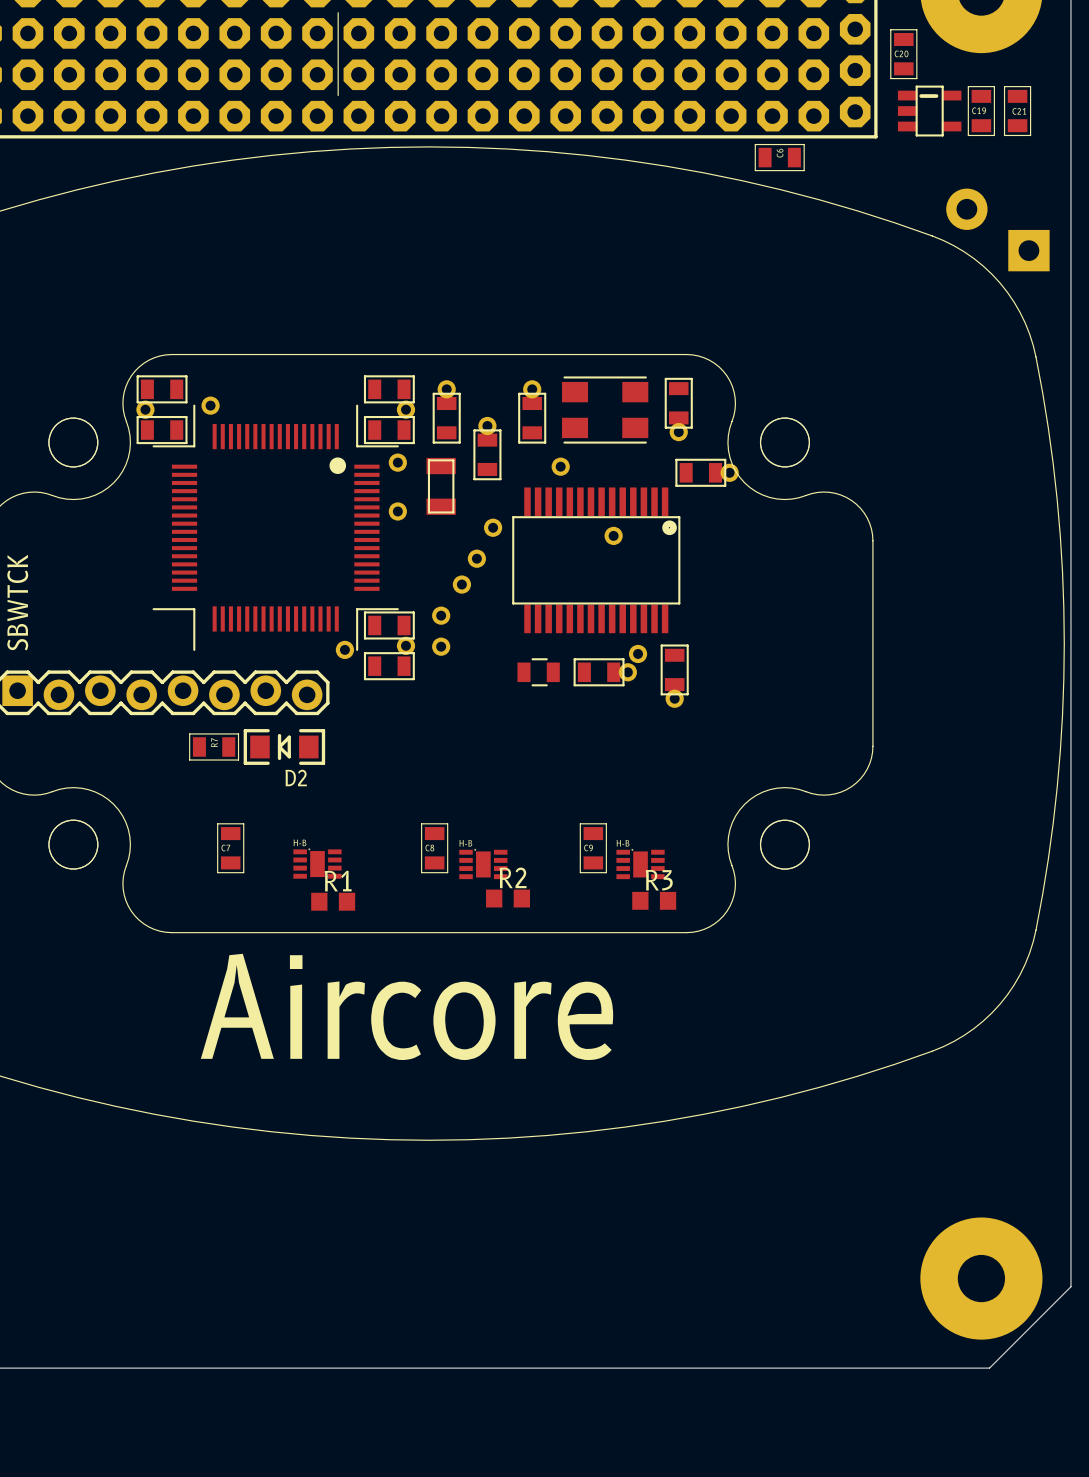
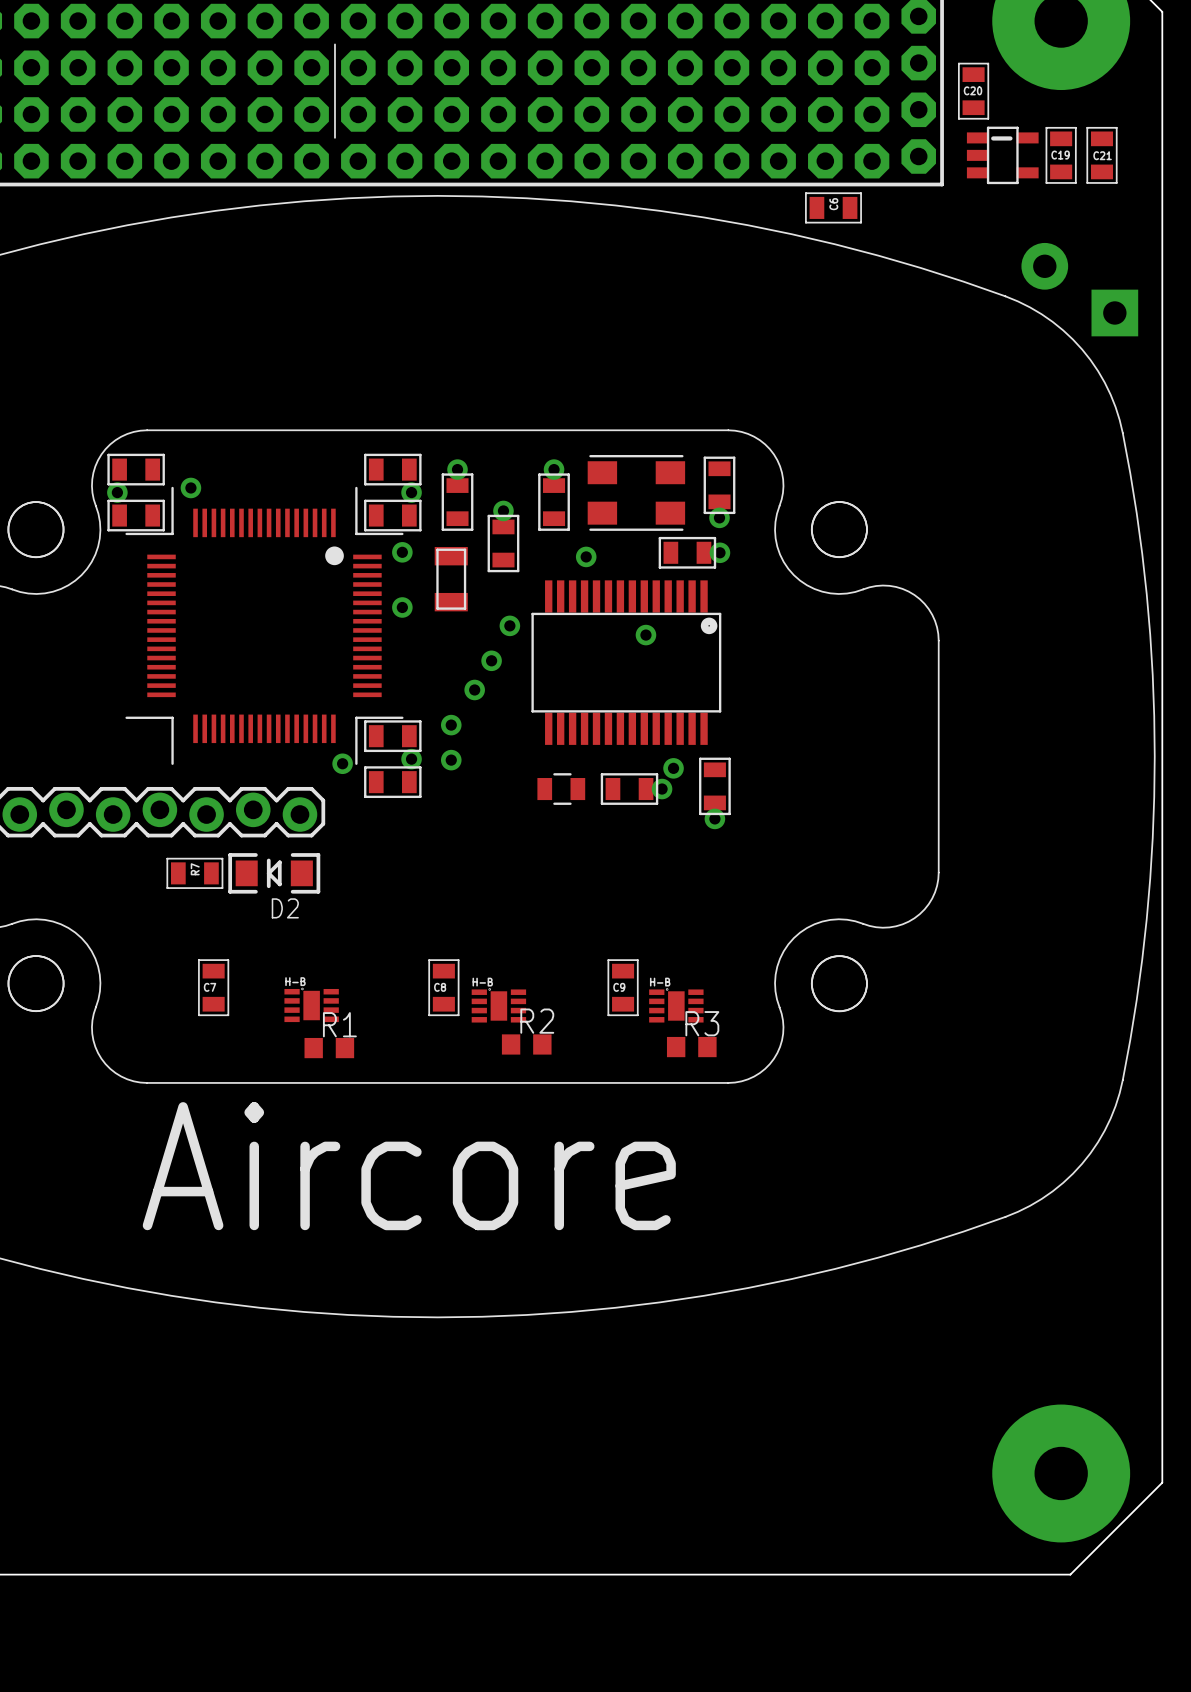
part: none -> (421, 641)
part: (437, 541) -> none

